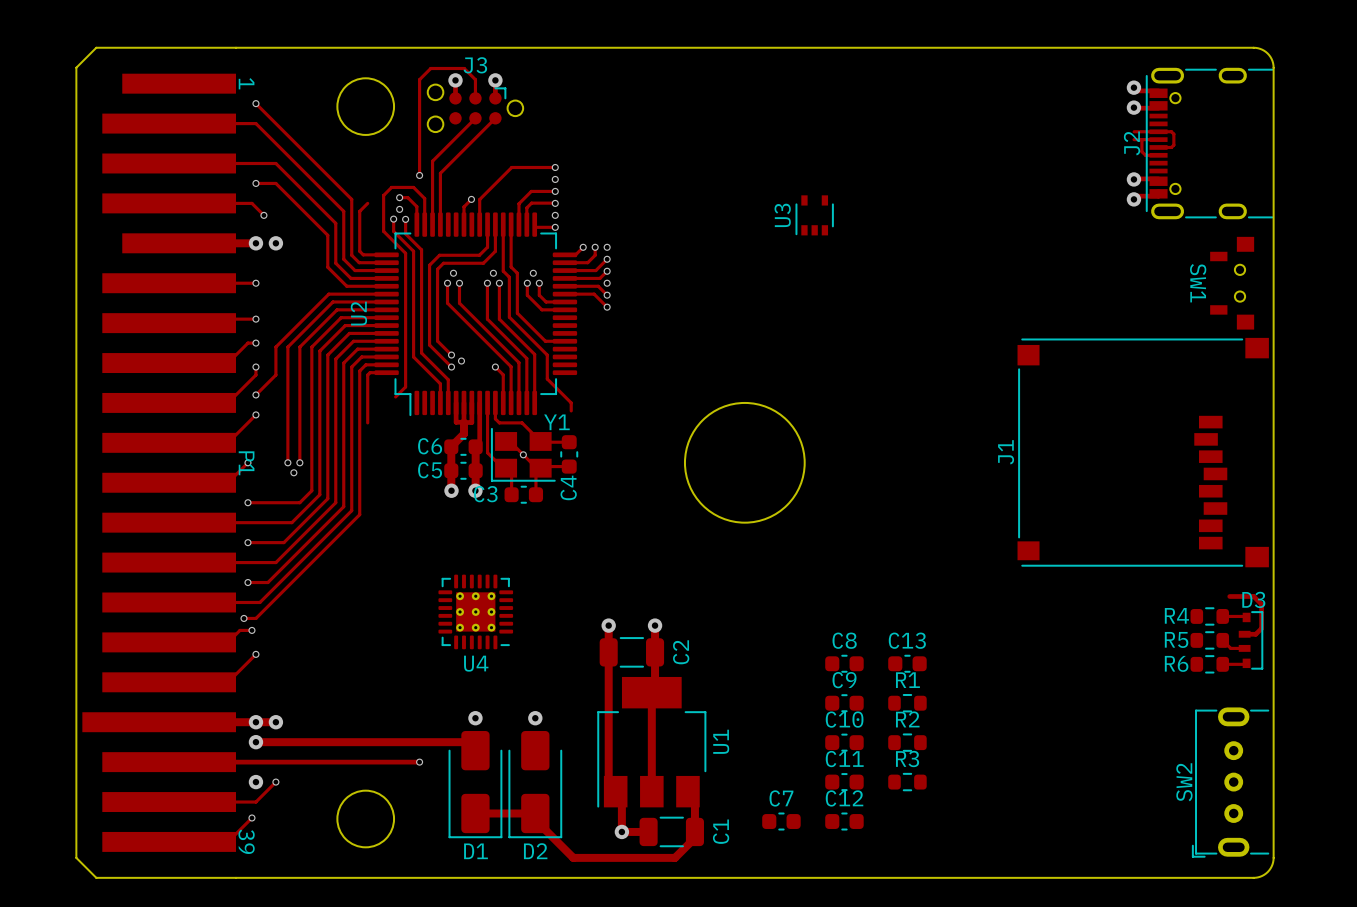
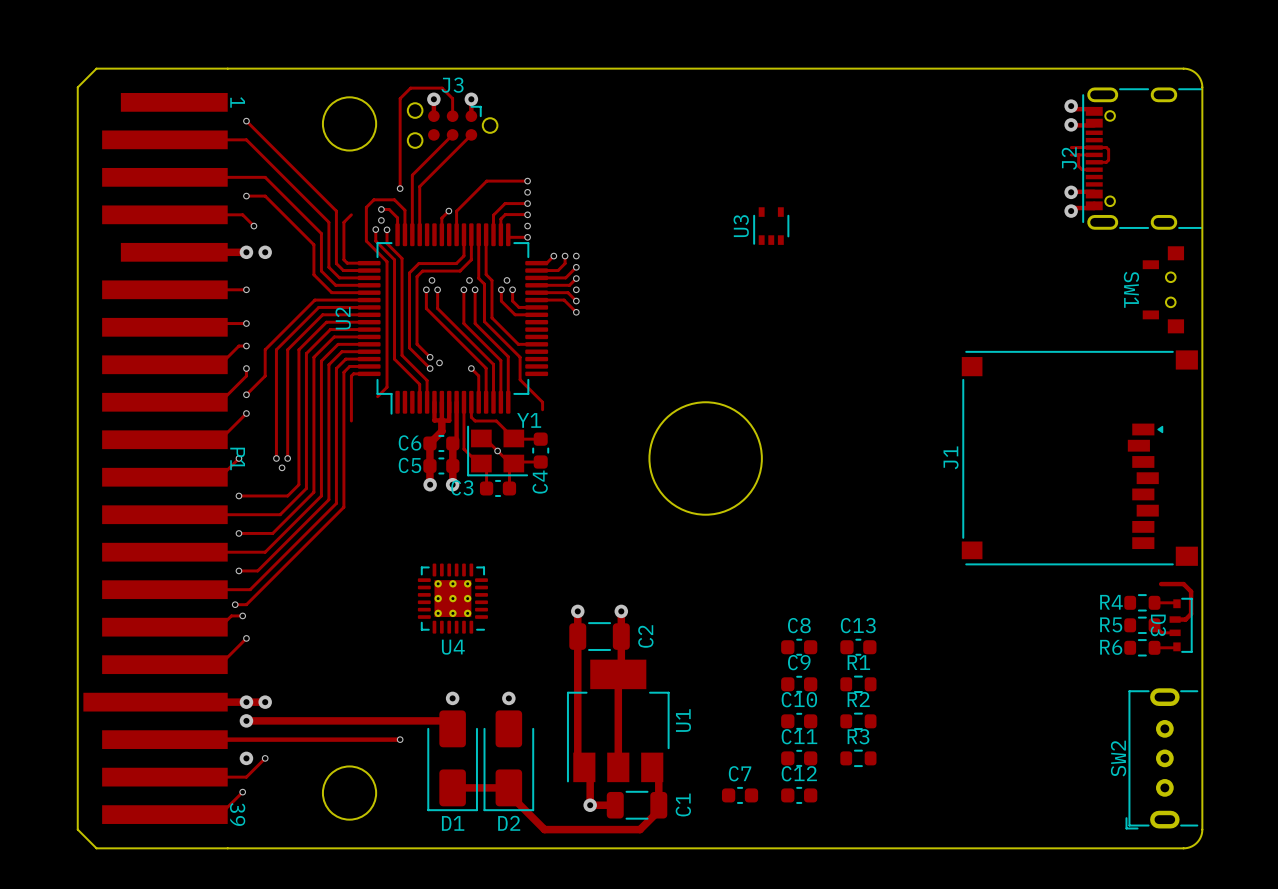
J1 footprint: [1017, 337, 1269, 568] -> [961, 350, 1198, 566]
D3 name rotation: 0° (1253, 599) -> 90° clockwise (1158, 625)
D3 name position: D3 (1253, 599) -> D3 (1158, 625)

